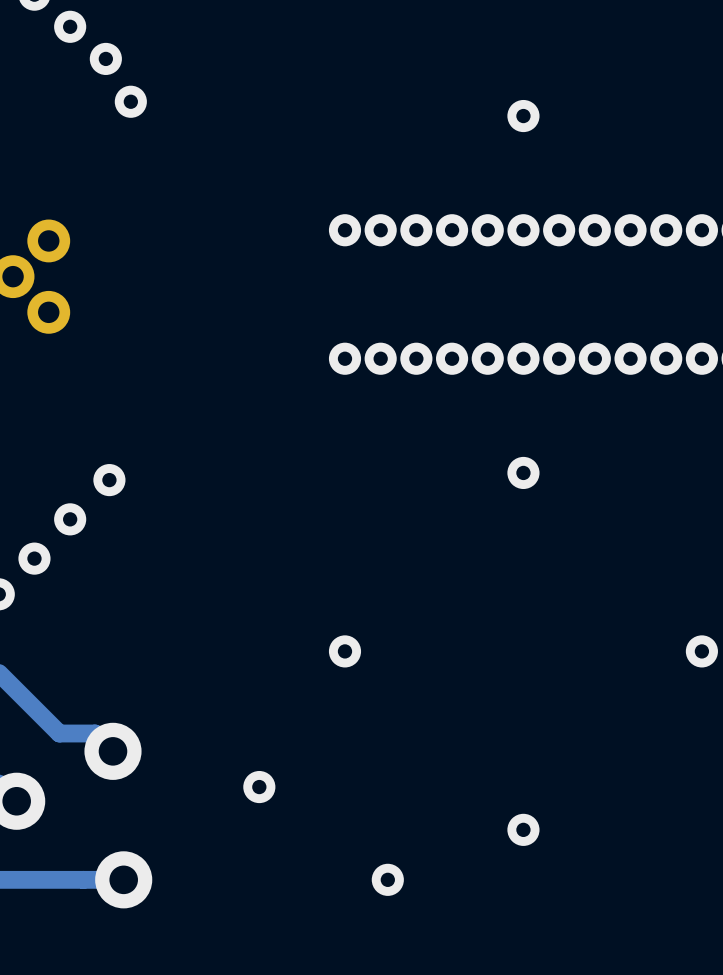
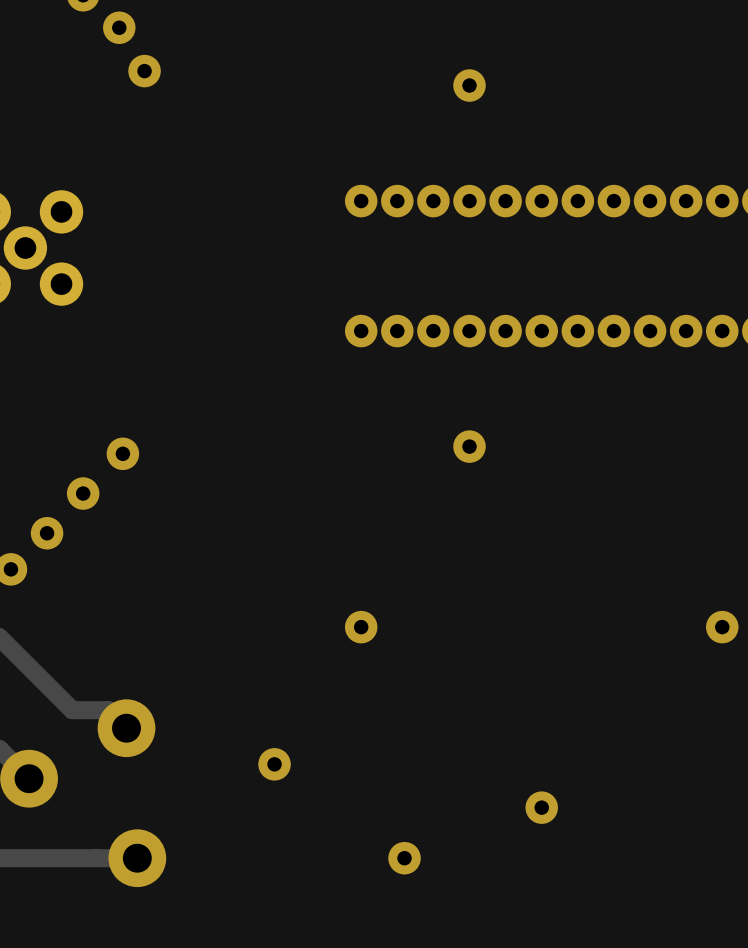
via position: (523, 116) -> (469, 85)
via position: (523, 472) -> (469, 446)

